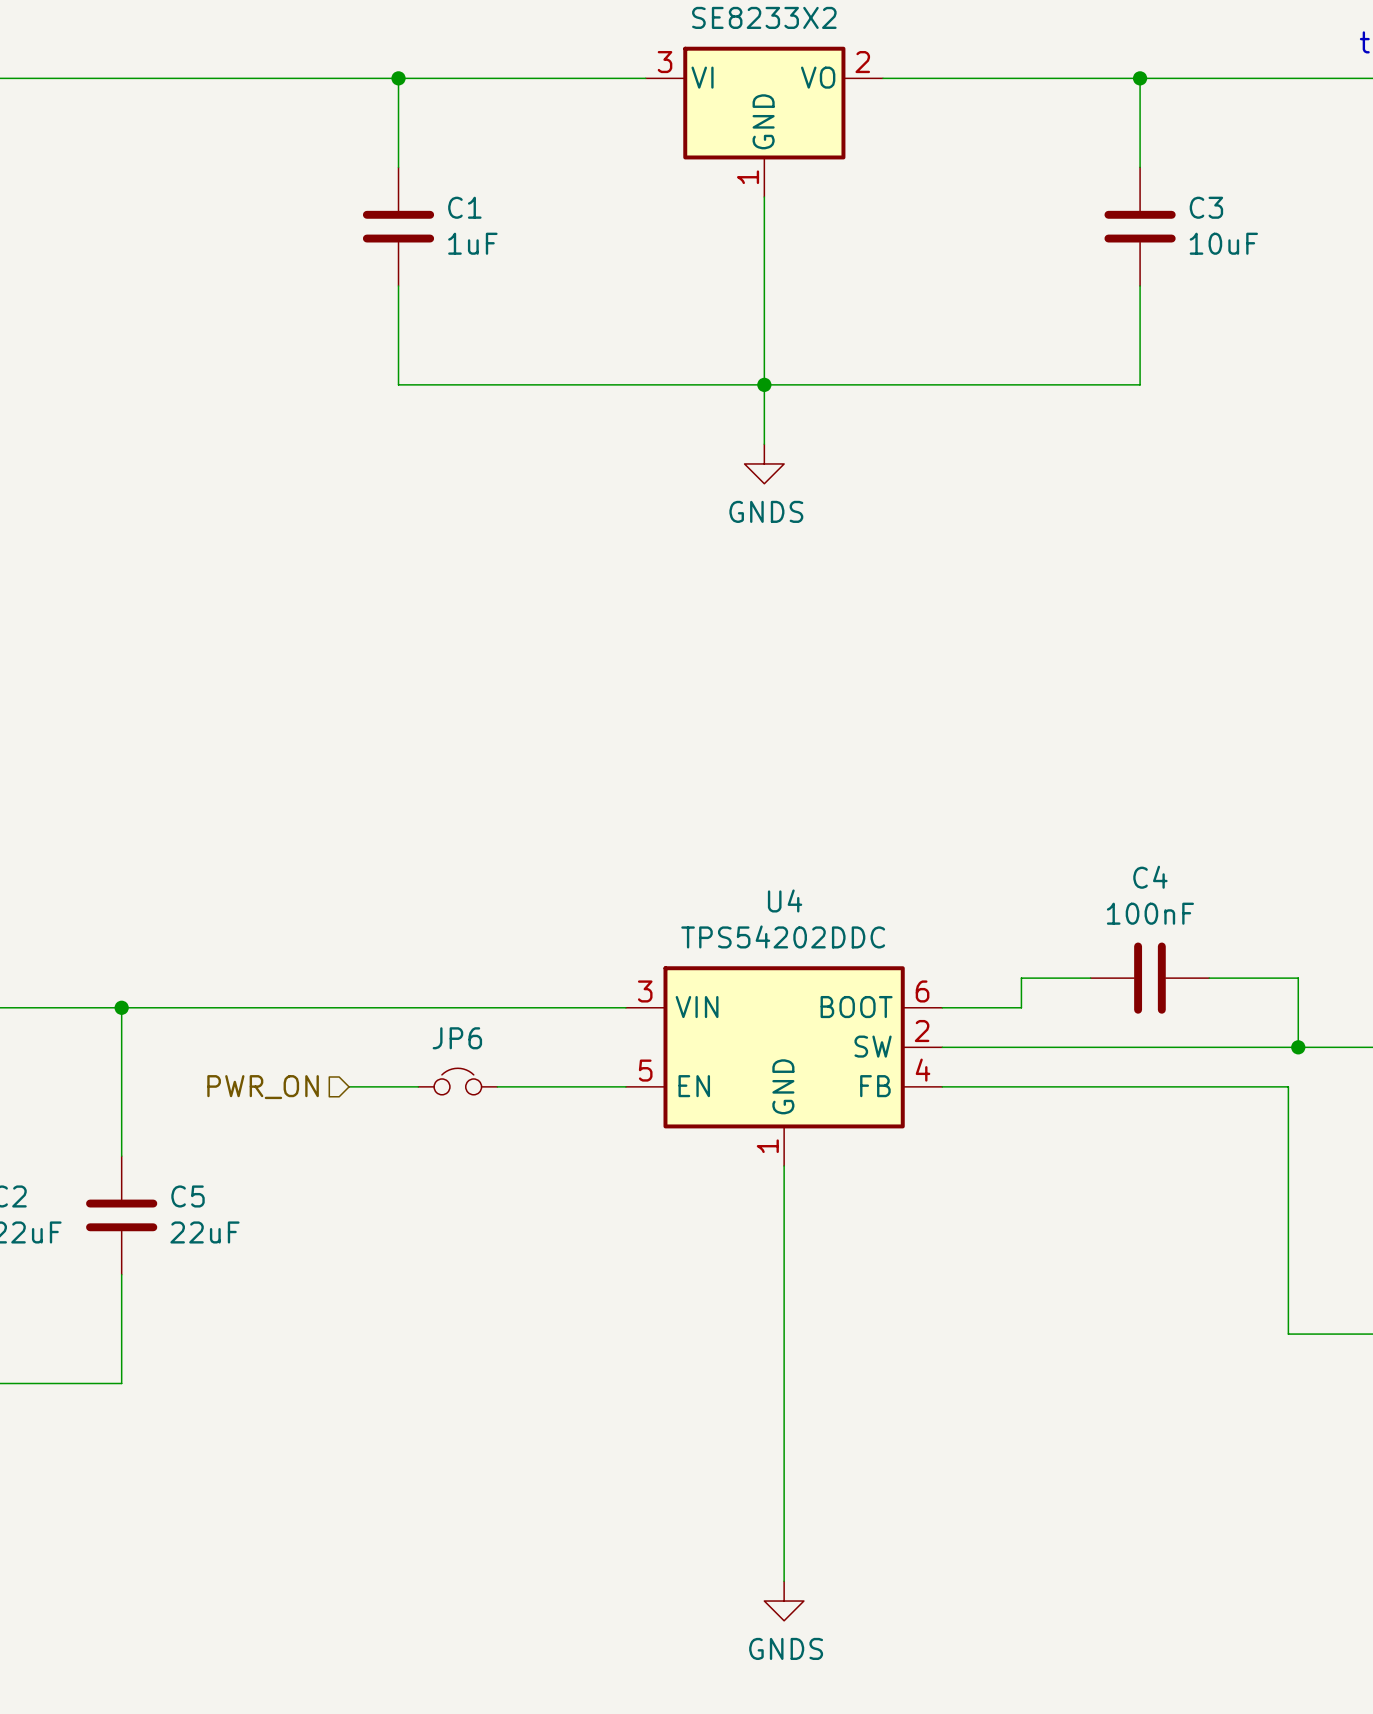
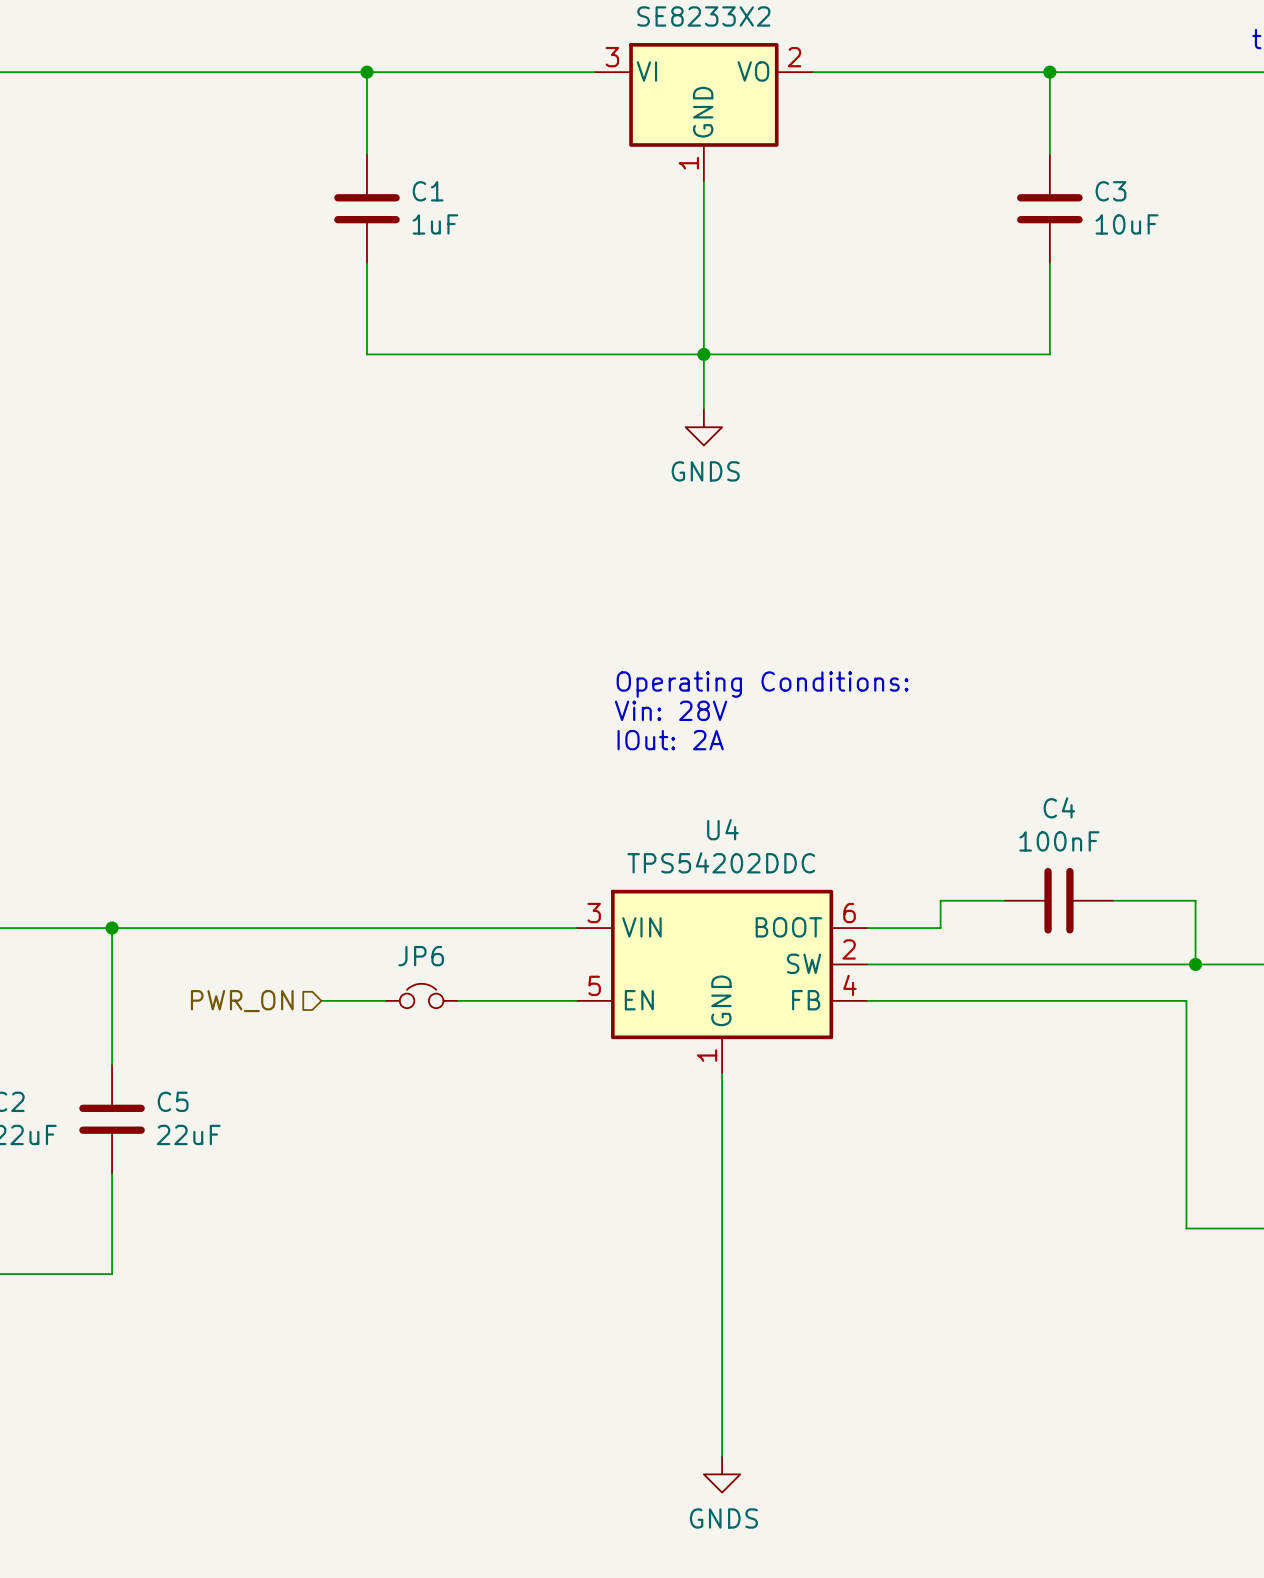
text: none -> Operating Conditions: (762, 684)
text: none -> Vin: 28V (671, 710)
text: none -> IOut: 2A (670, 740)

